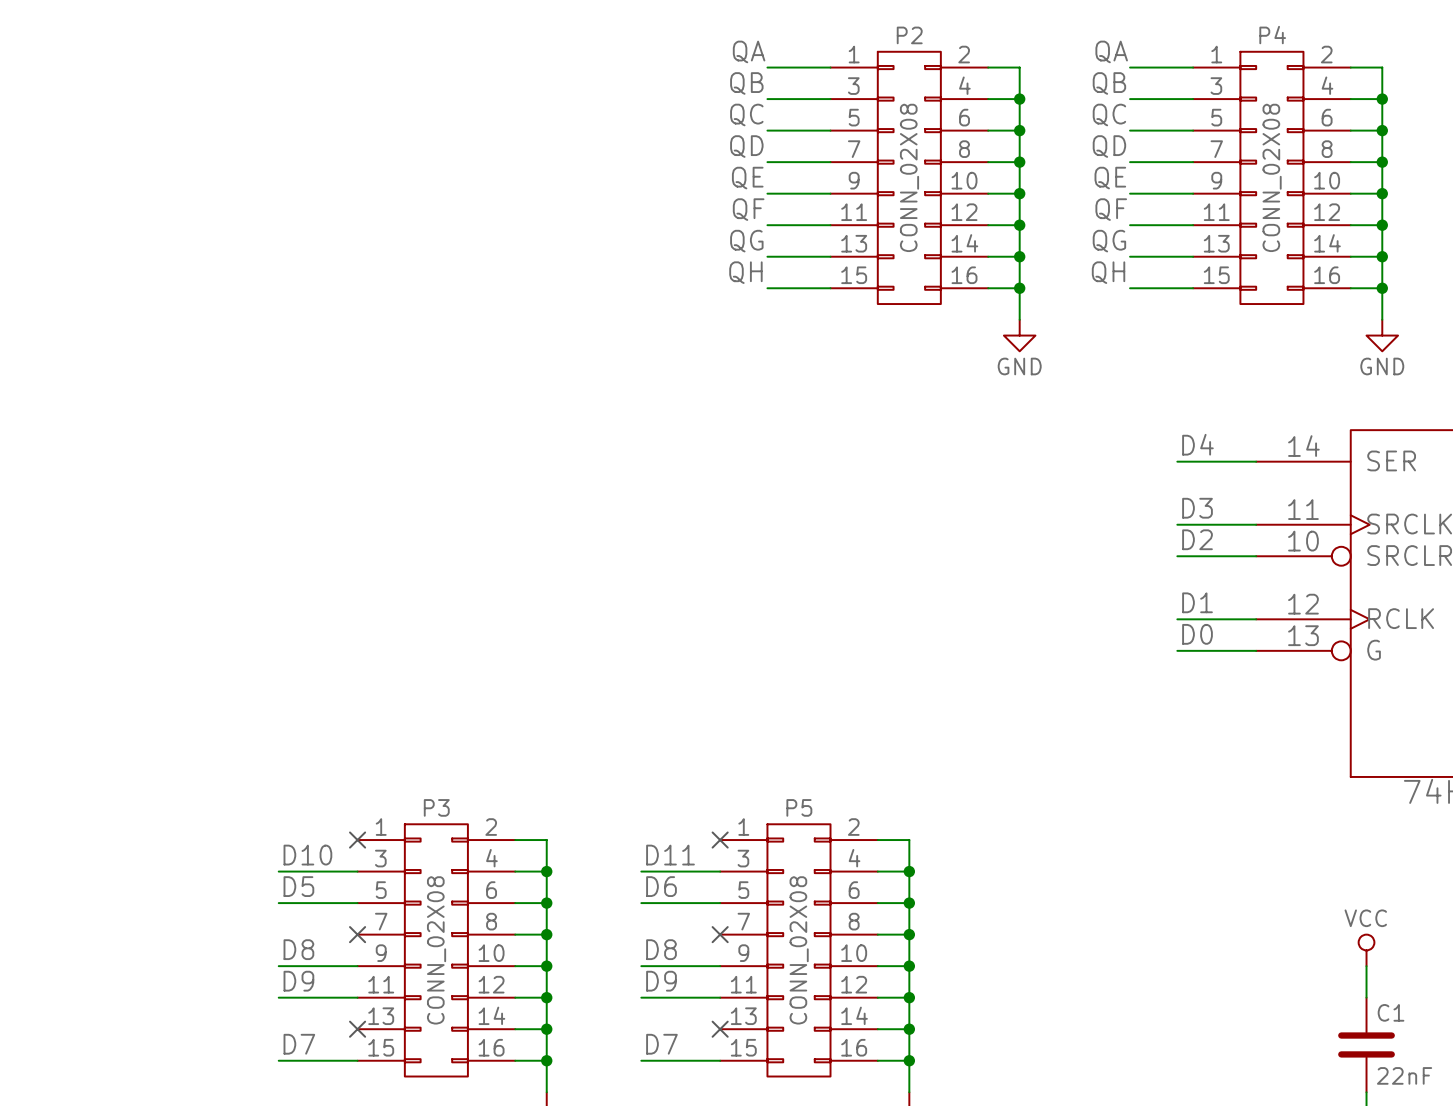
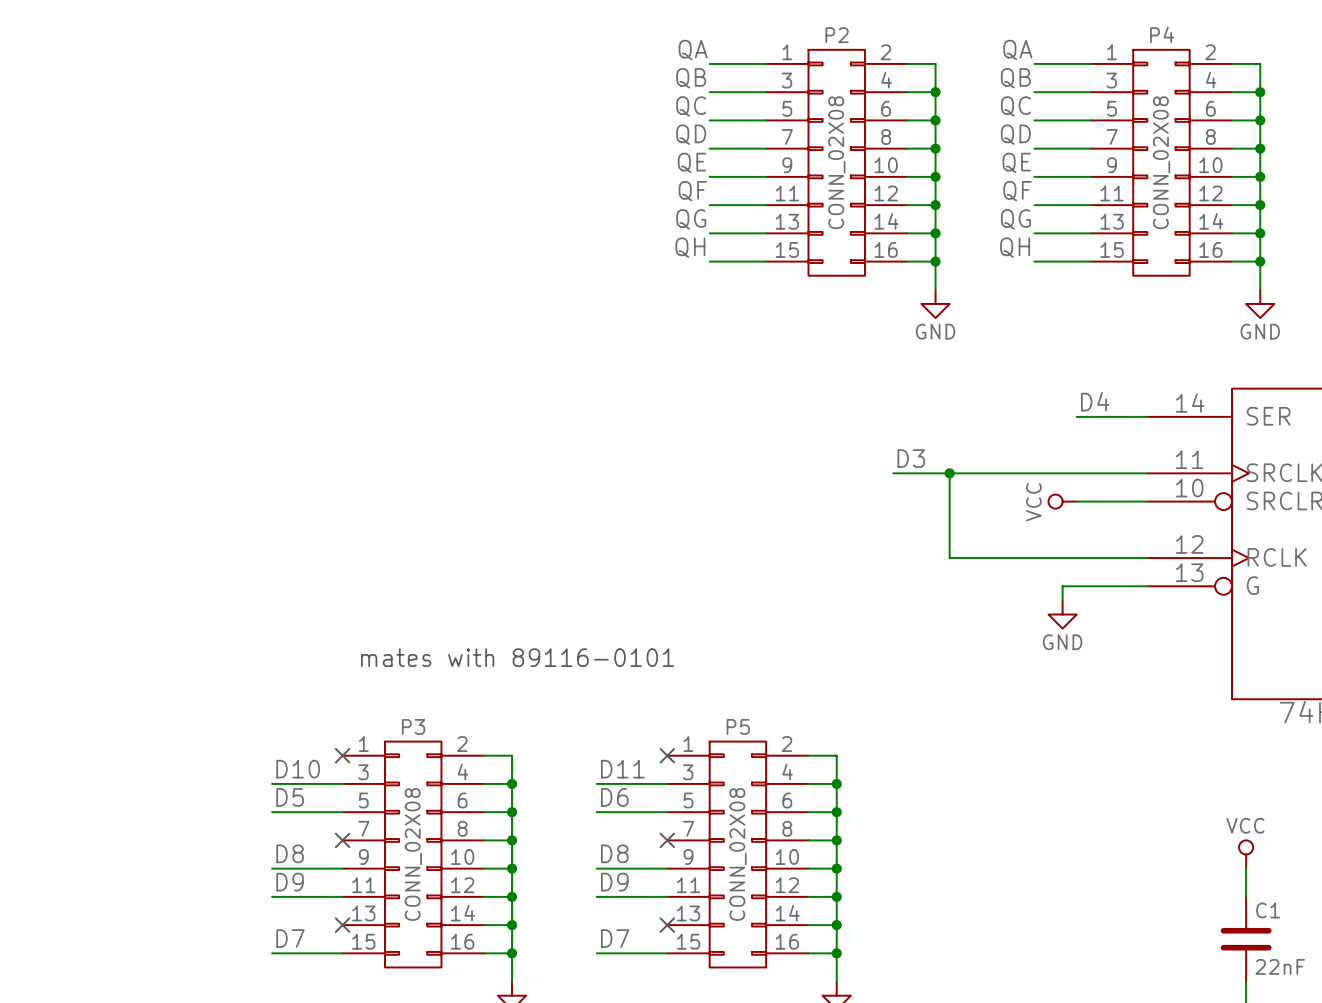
label position: D3 (1197, 508) -> D3 (911, 458)
wire: none -> (893, 473) (1076, 473)
wire: none -> (949, 473) (949, 558) (1076, 558)
junction: none -> (949, 473)
label: D2 (1197, 539) -> none
power symbol: none -> VCC (1062, 501)
label: D1 (1197, 602) -> none
label: D0 (1197, 634) -> none
wire: none -> (1076, 586) (1062, 586) (1062, 600)
power symbol: none -> GND (1062, 614)
text: none -> mates with 89116-0101 (517, 657)

